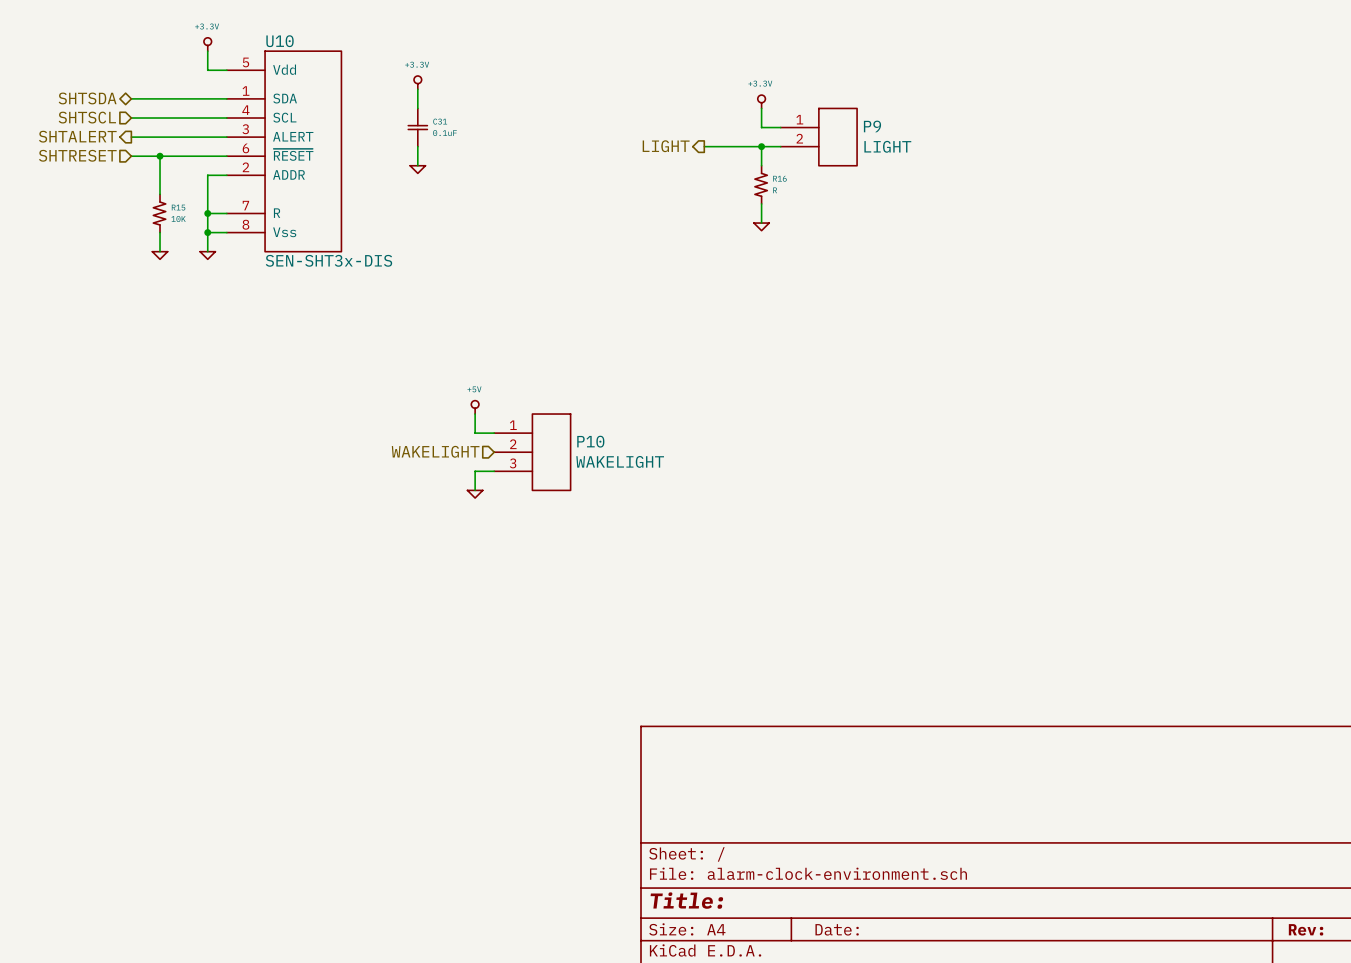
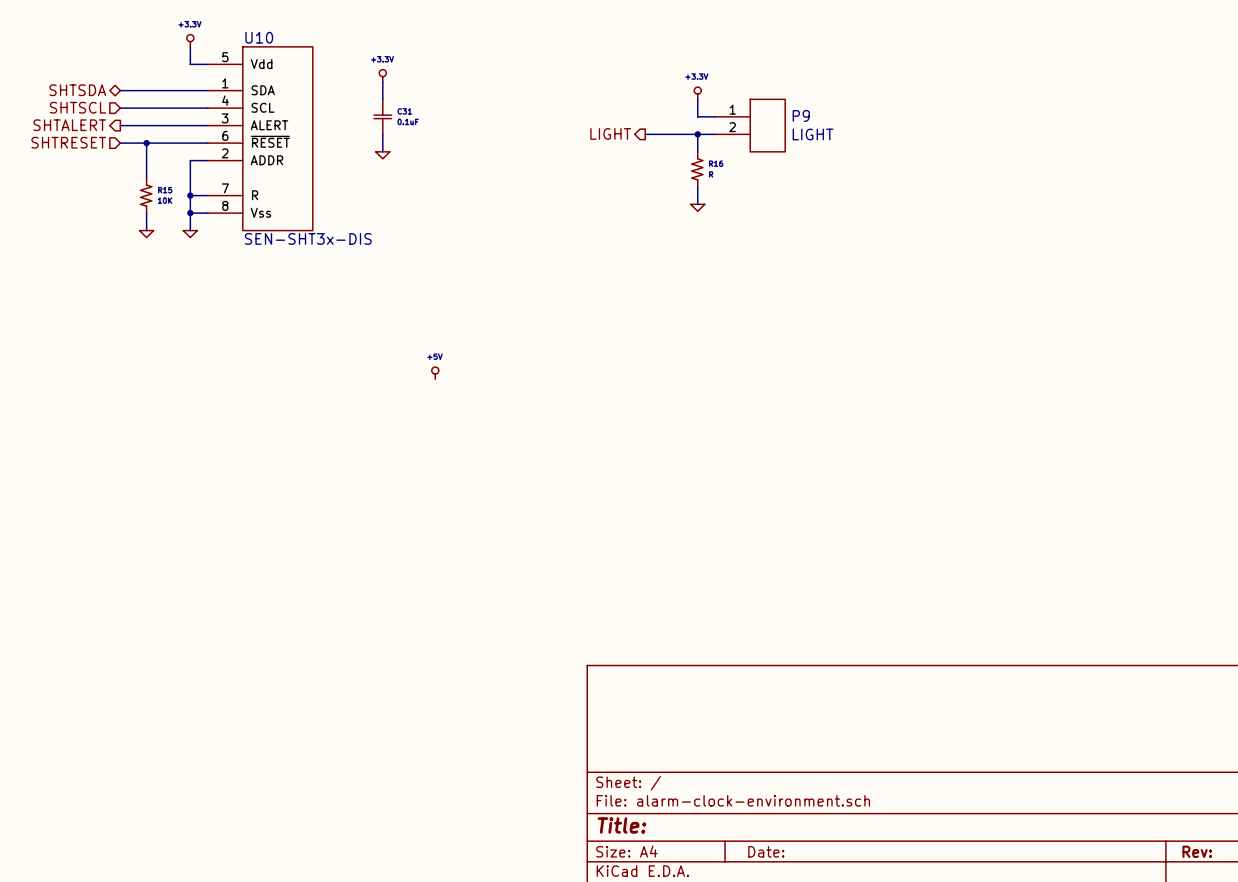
wire: (475, 414) (475, 433) (494, 433) -> none
hierarchical label: WAKELIGHT (435, 451) -> none
P10: WAKELIGHT (532, 452) -> none
wire: (494, 471) (475, 471) (475, 490) -> none
power symbol: (475, 494) -> none

